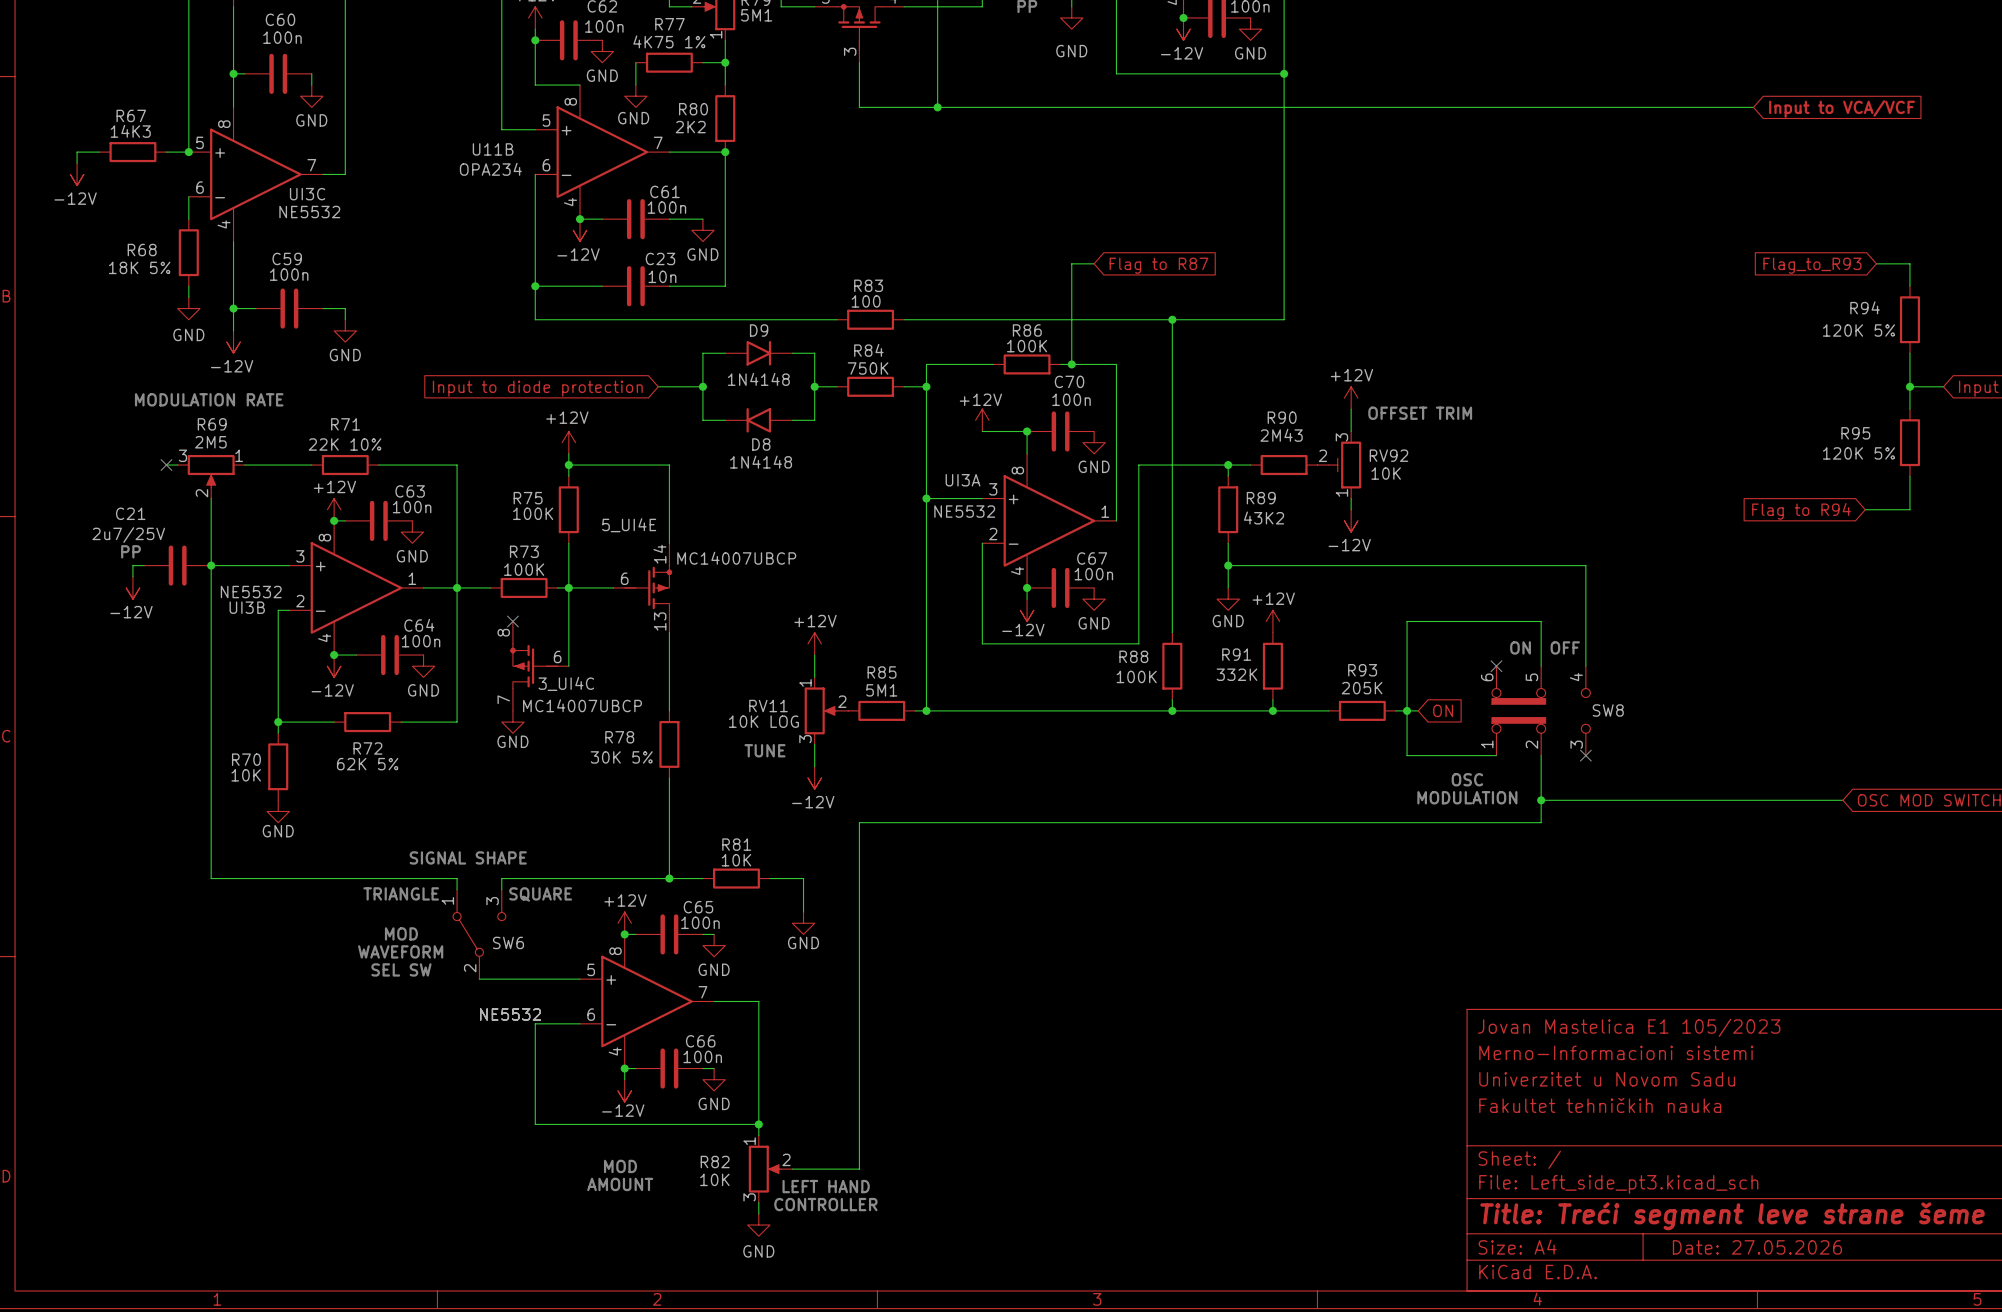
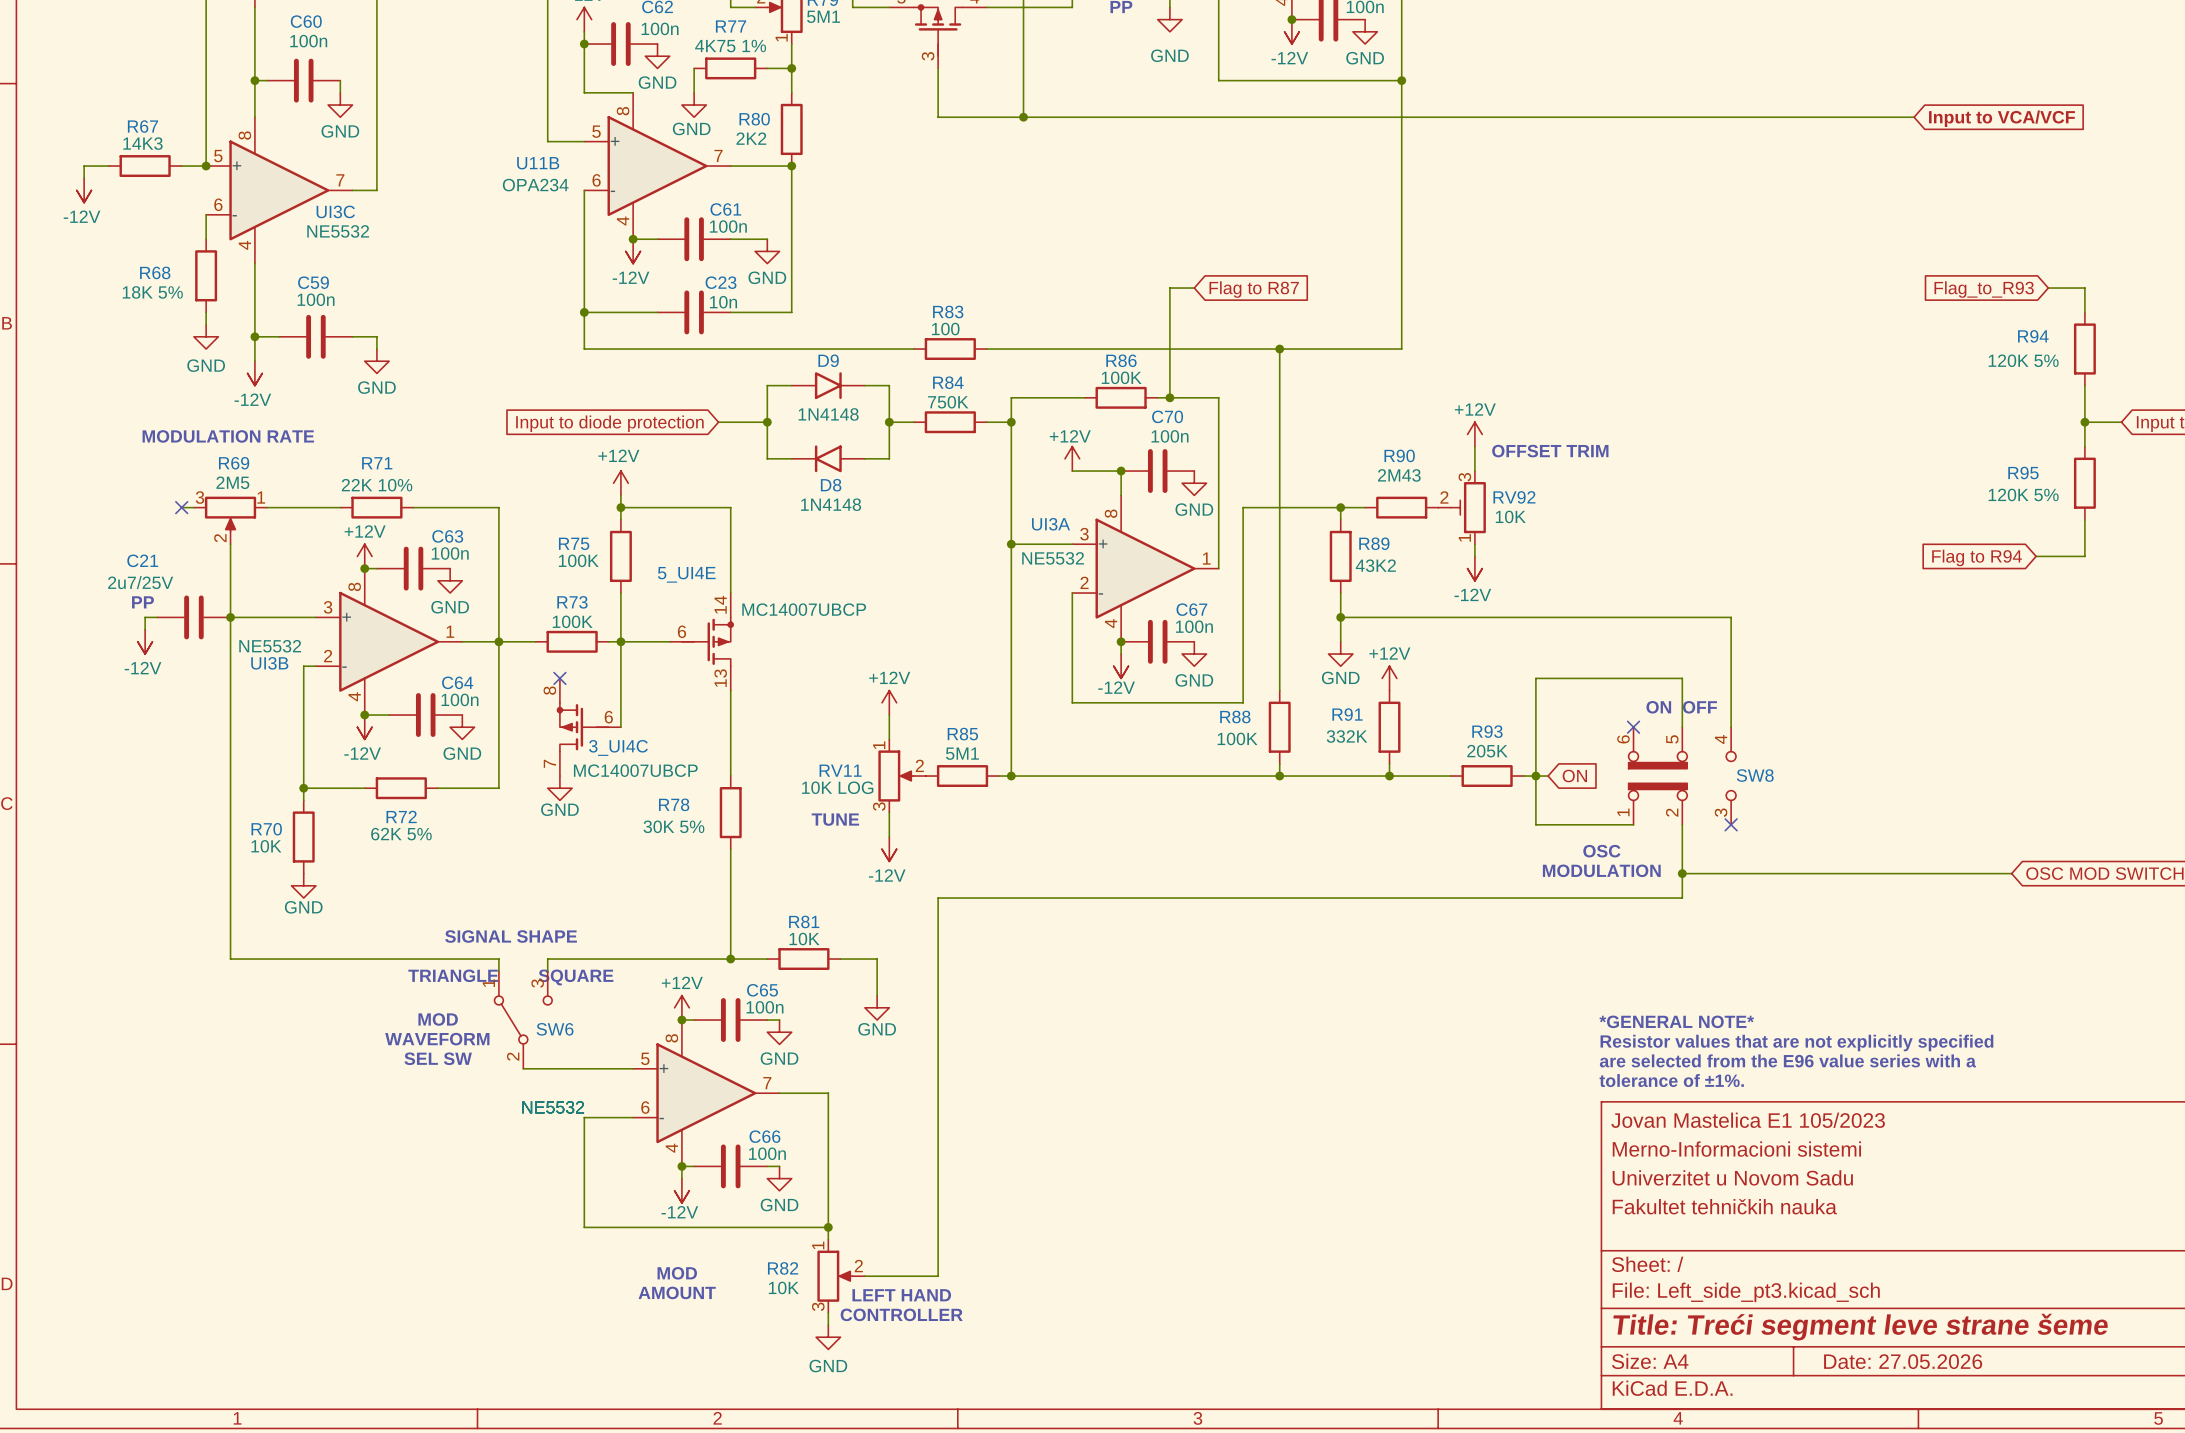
text: none -> *GENERAL NOTE* (1676, 1021)
text: none -> Resistor values that are not explicitly specified (1796, 1043)
text: none -> are selected from the E96 value series with a (1787, 1060)
text: none -> tolerance of ±1%. (1671, 1080)

